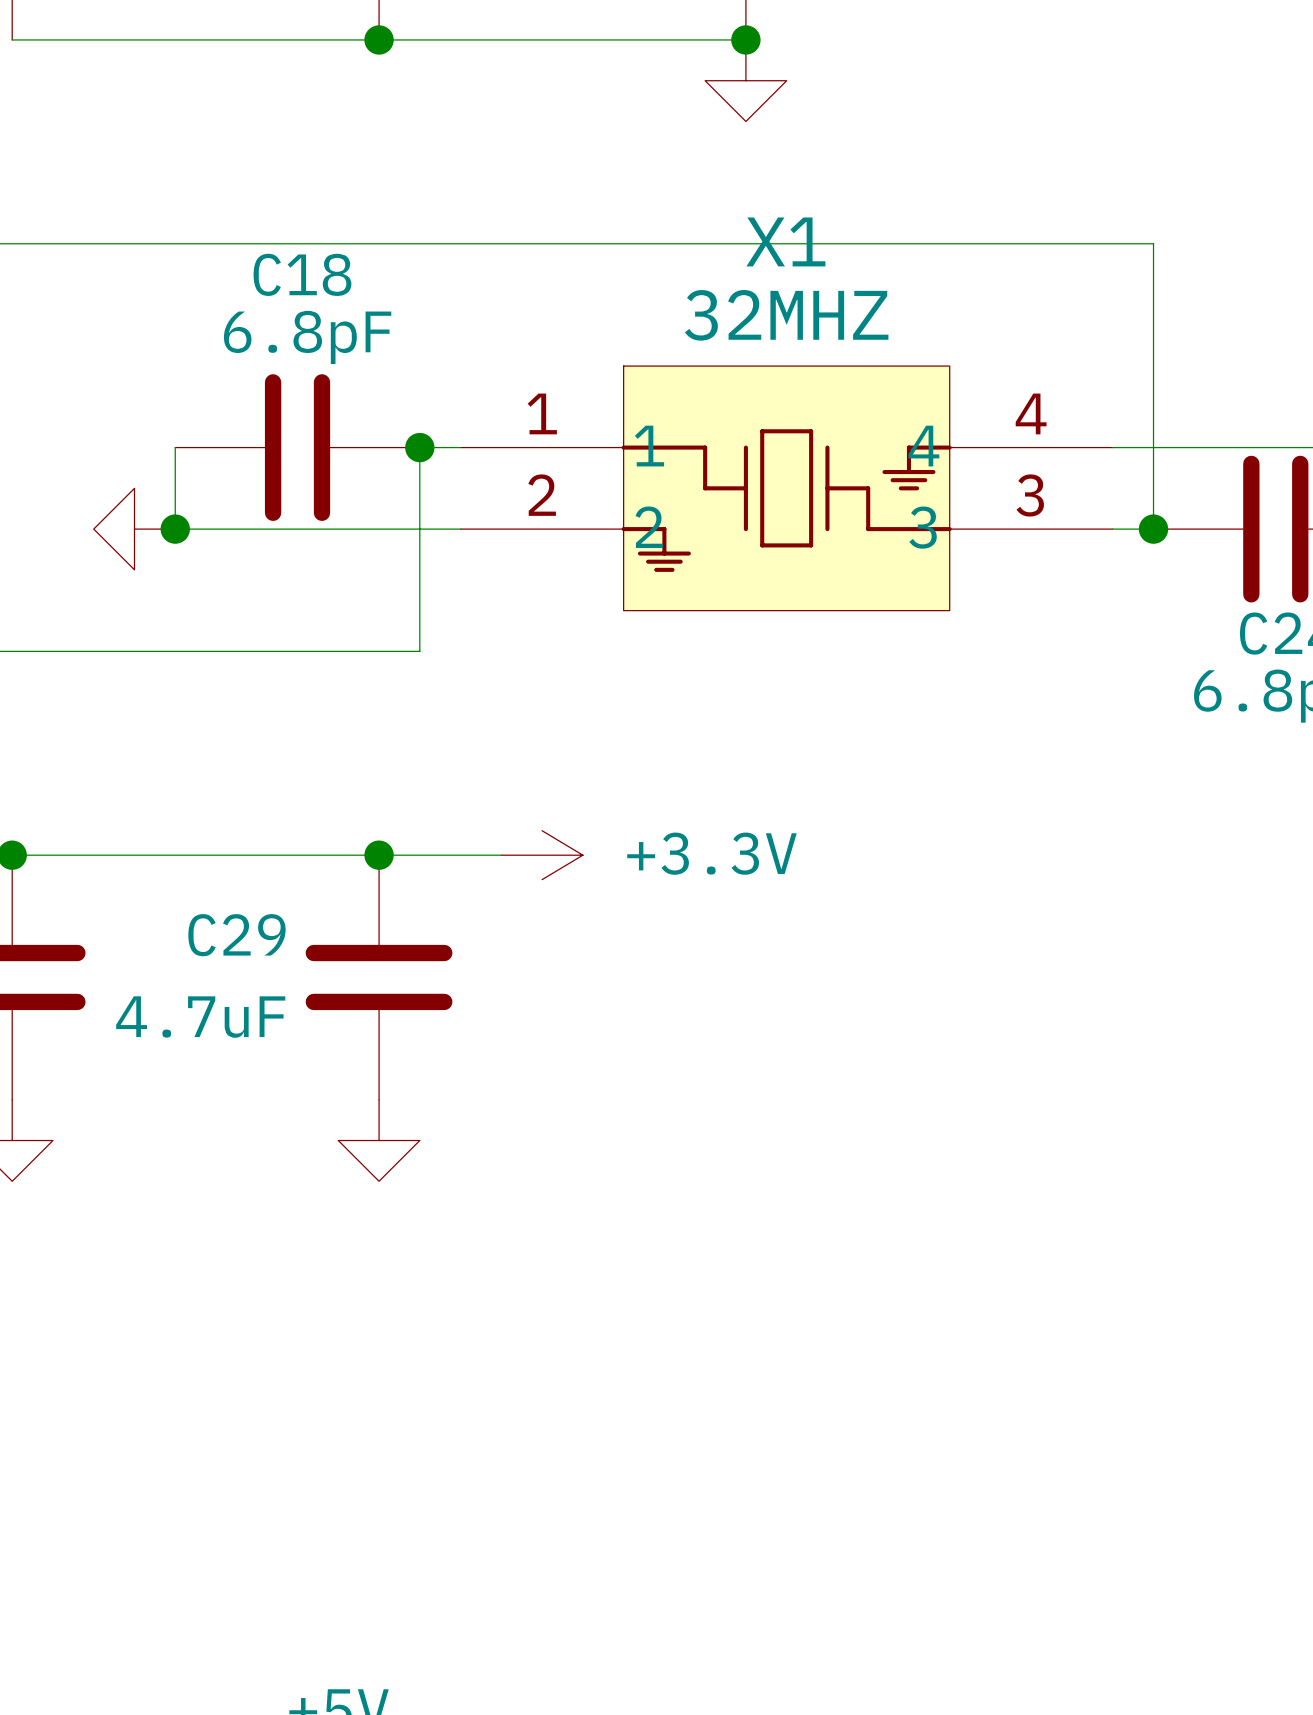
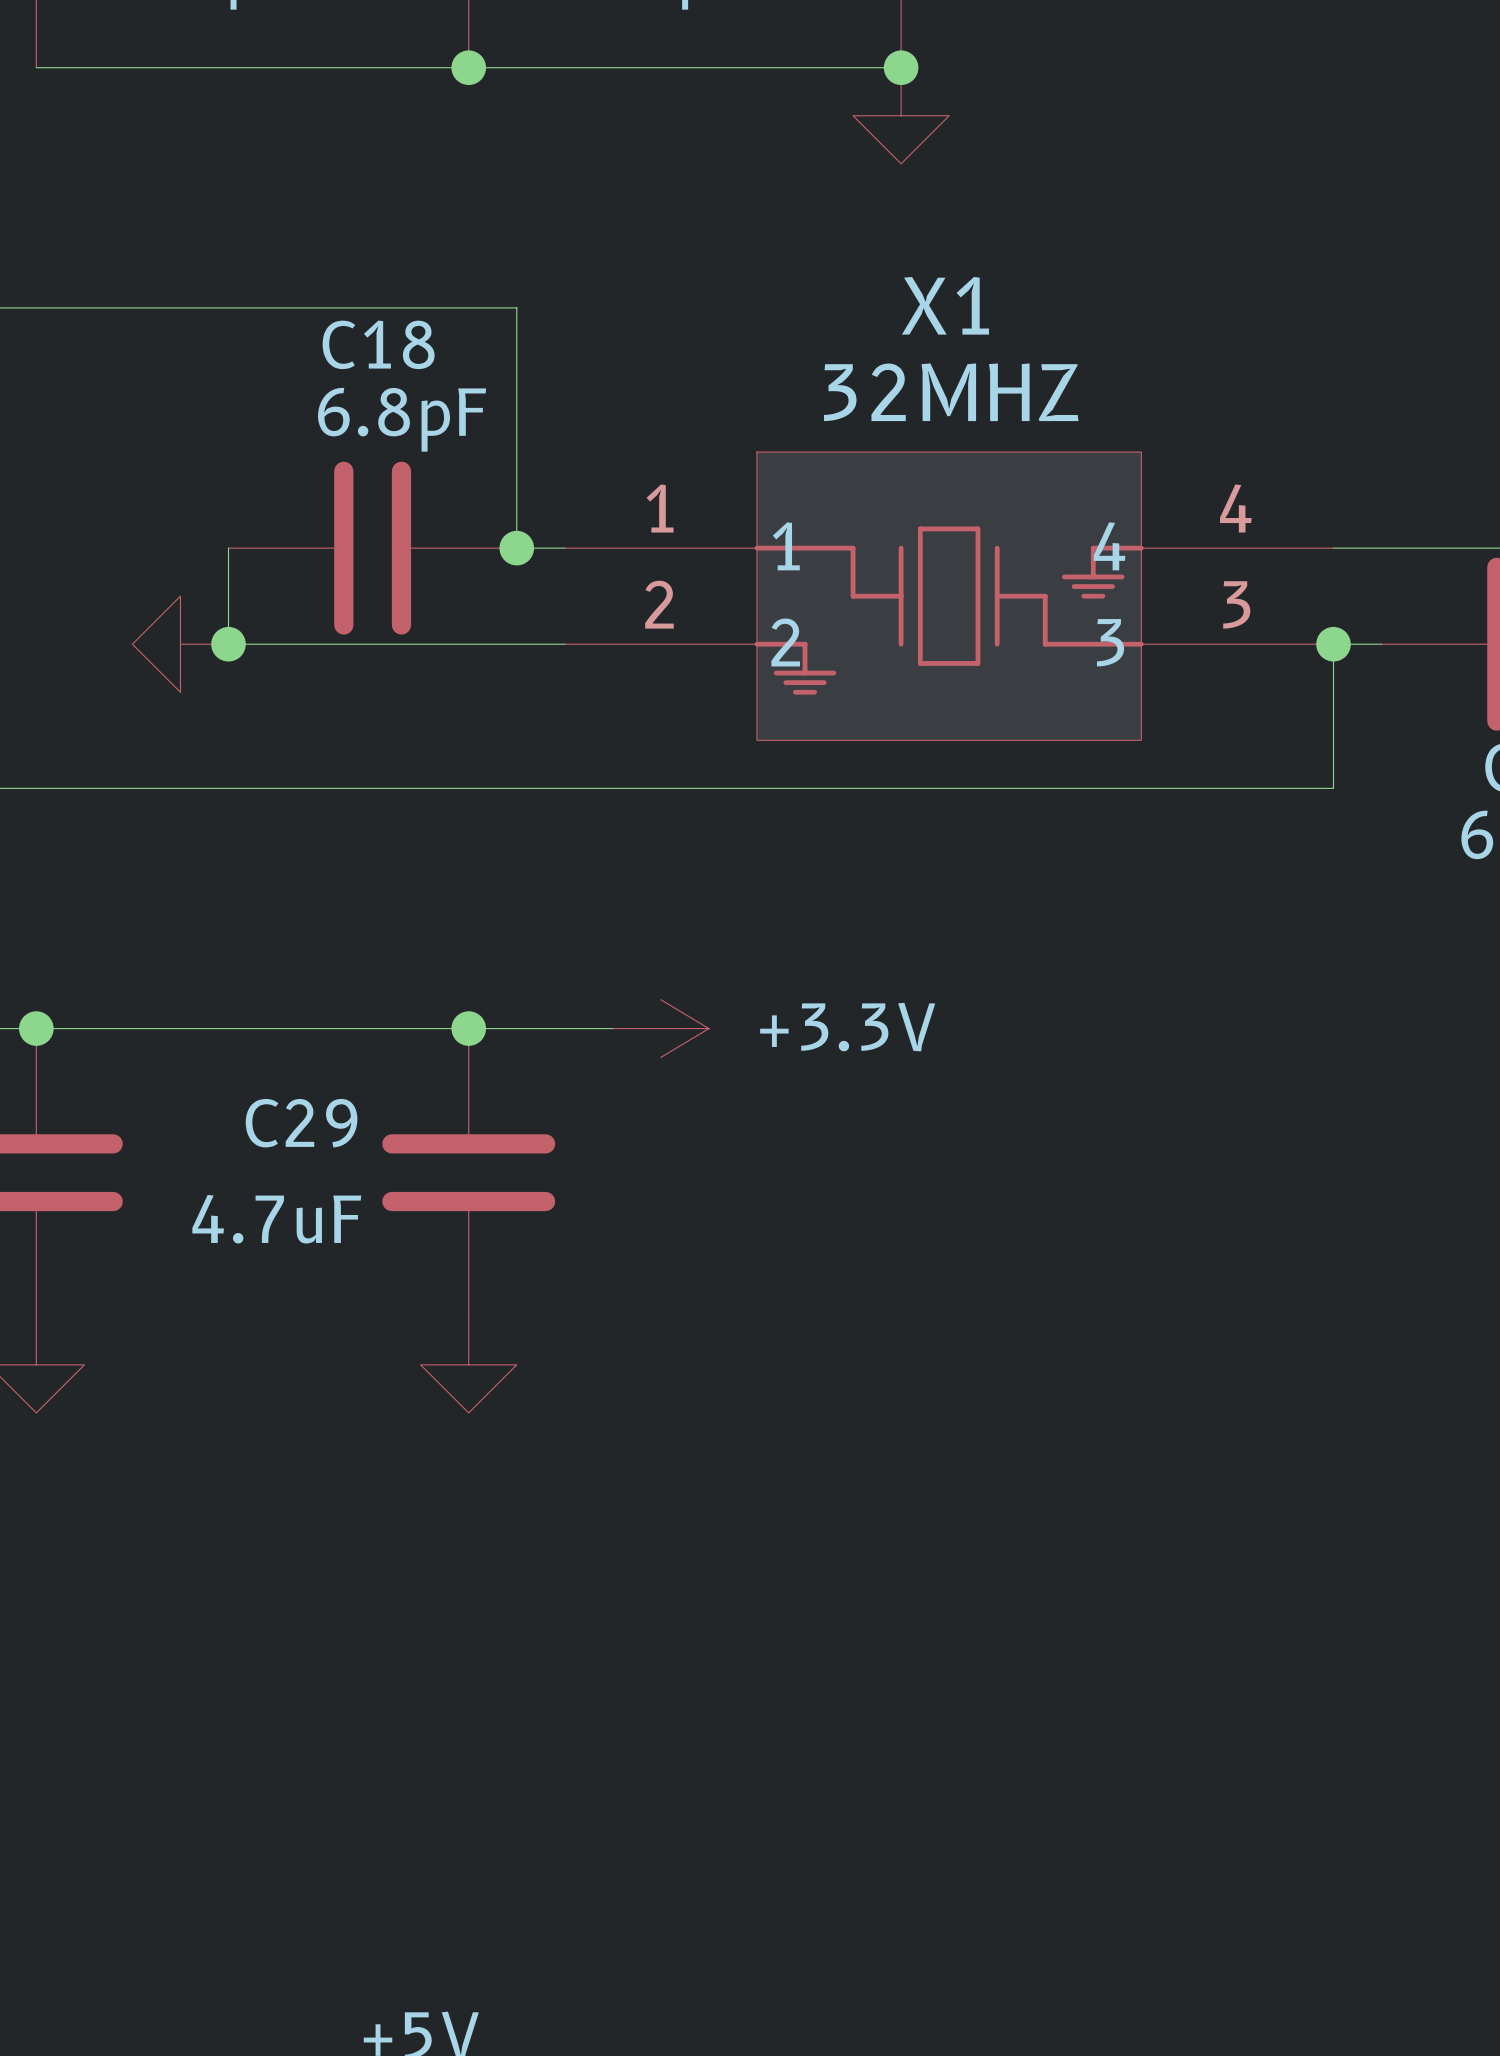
wire: (419, 243) (1153, 243) (1153, 529) -> none
wire: (419, 447) (419, 651) -> (516, 548) (516, 307)
wire: none -> (1333, 644) (1333, 788) (516, 788)
junction position: (1153, 529) -> (1333, 644)

